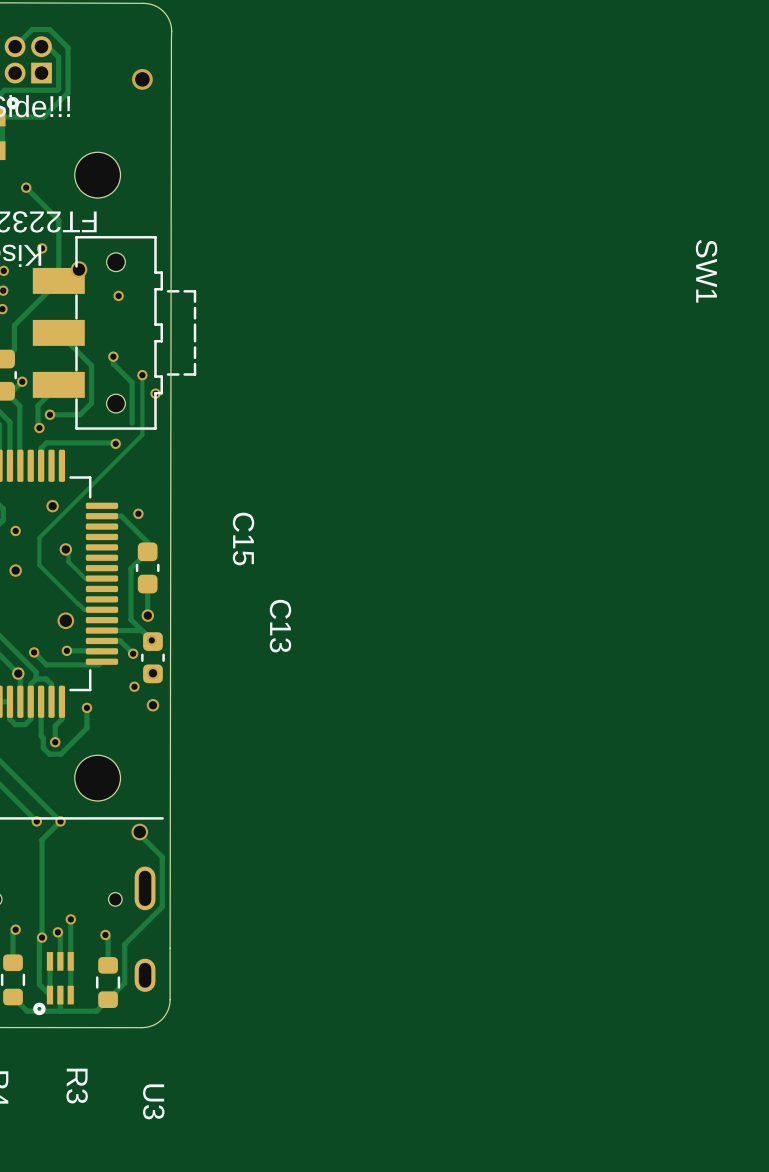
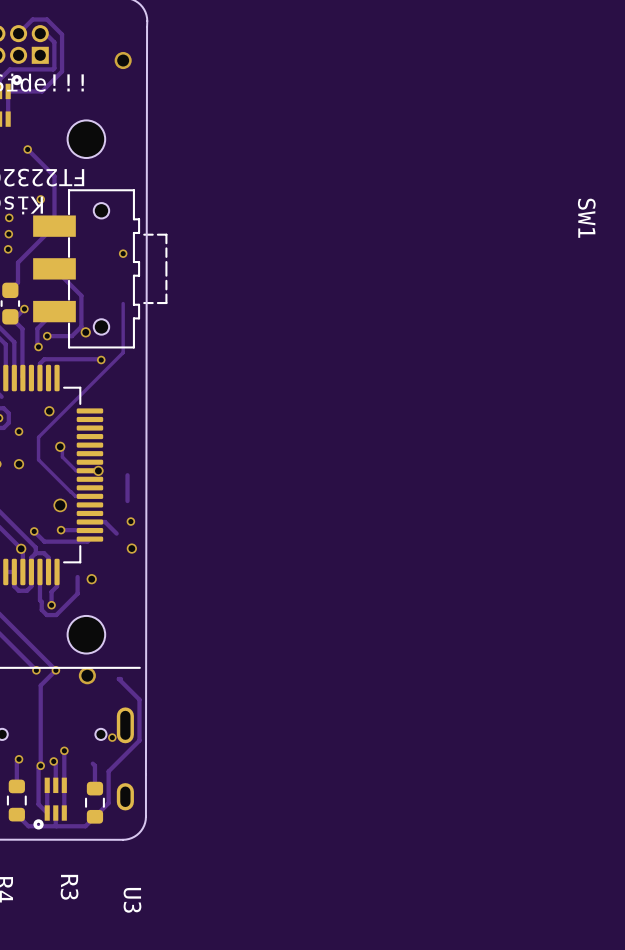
via: (79, 269) -> none
via: (118, 295) -> none
via: none -> (123, 253)
track: (113, 354) (113, 363) (132, 382) (132, 423) -> none
via: (113, 356) -> none
via: (142, 375) -> none
via: (155, 393) -> none
via: none -> (85, 332)
via: (138, 513) -> none
track: (101, 516) (121, 516) (147, 542) (147, 551) (131, 568) (131, 619) (152, 641) -> none
C15: (147, 567) -> none
via position: (147, 615) -> (98, 470)
track: (141, 630) (101, 630) -> none
via: (133, 653) -> none
C13: (152, 657) -> none
via: (134, 686) -> none
via position: (152, 705) -> (91, 579)
via: (86, 707) -> none
via: none -> (87, 675)
via: (139, 831) -> none
via position: (105, 934) -> (112, 737)

